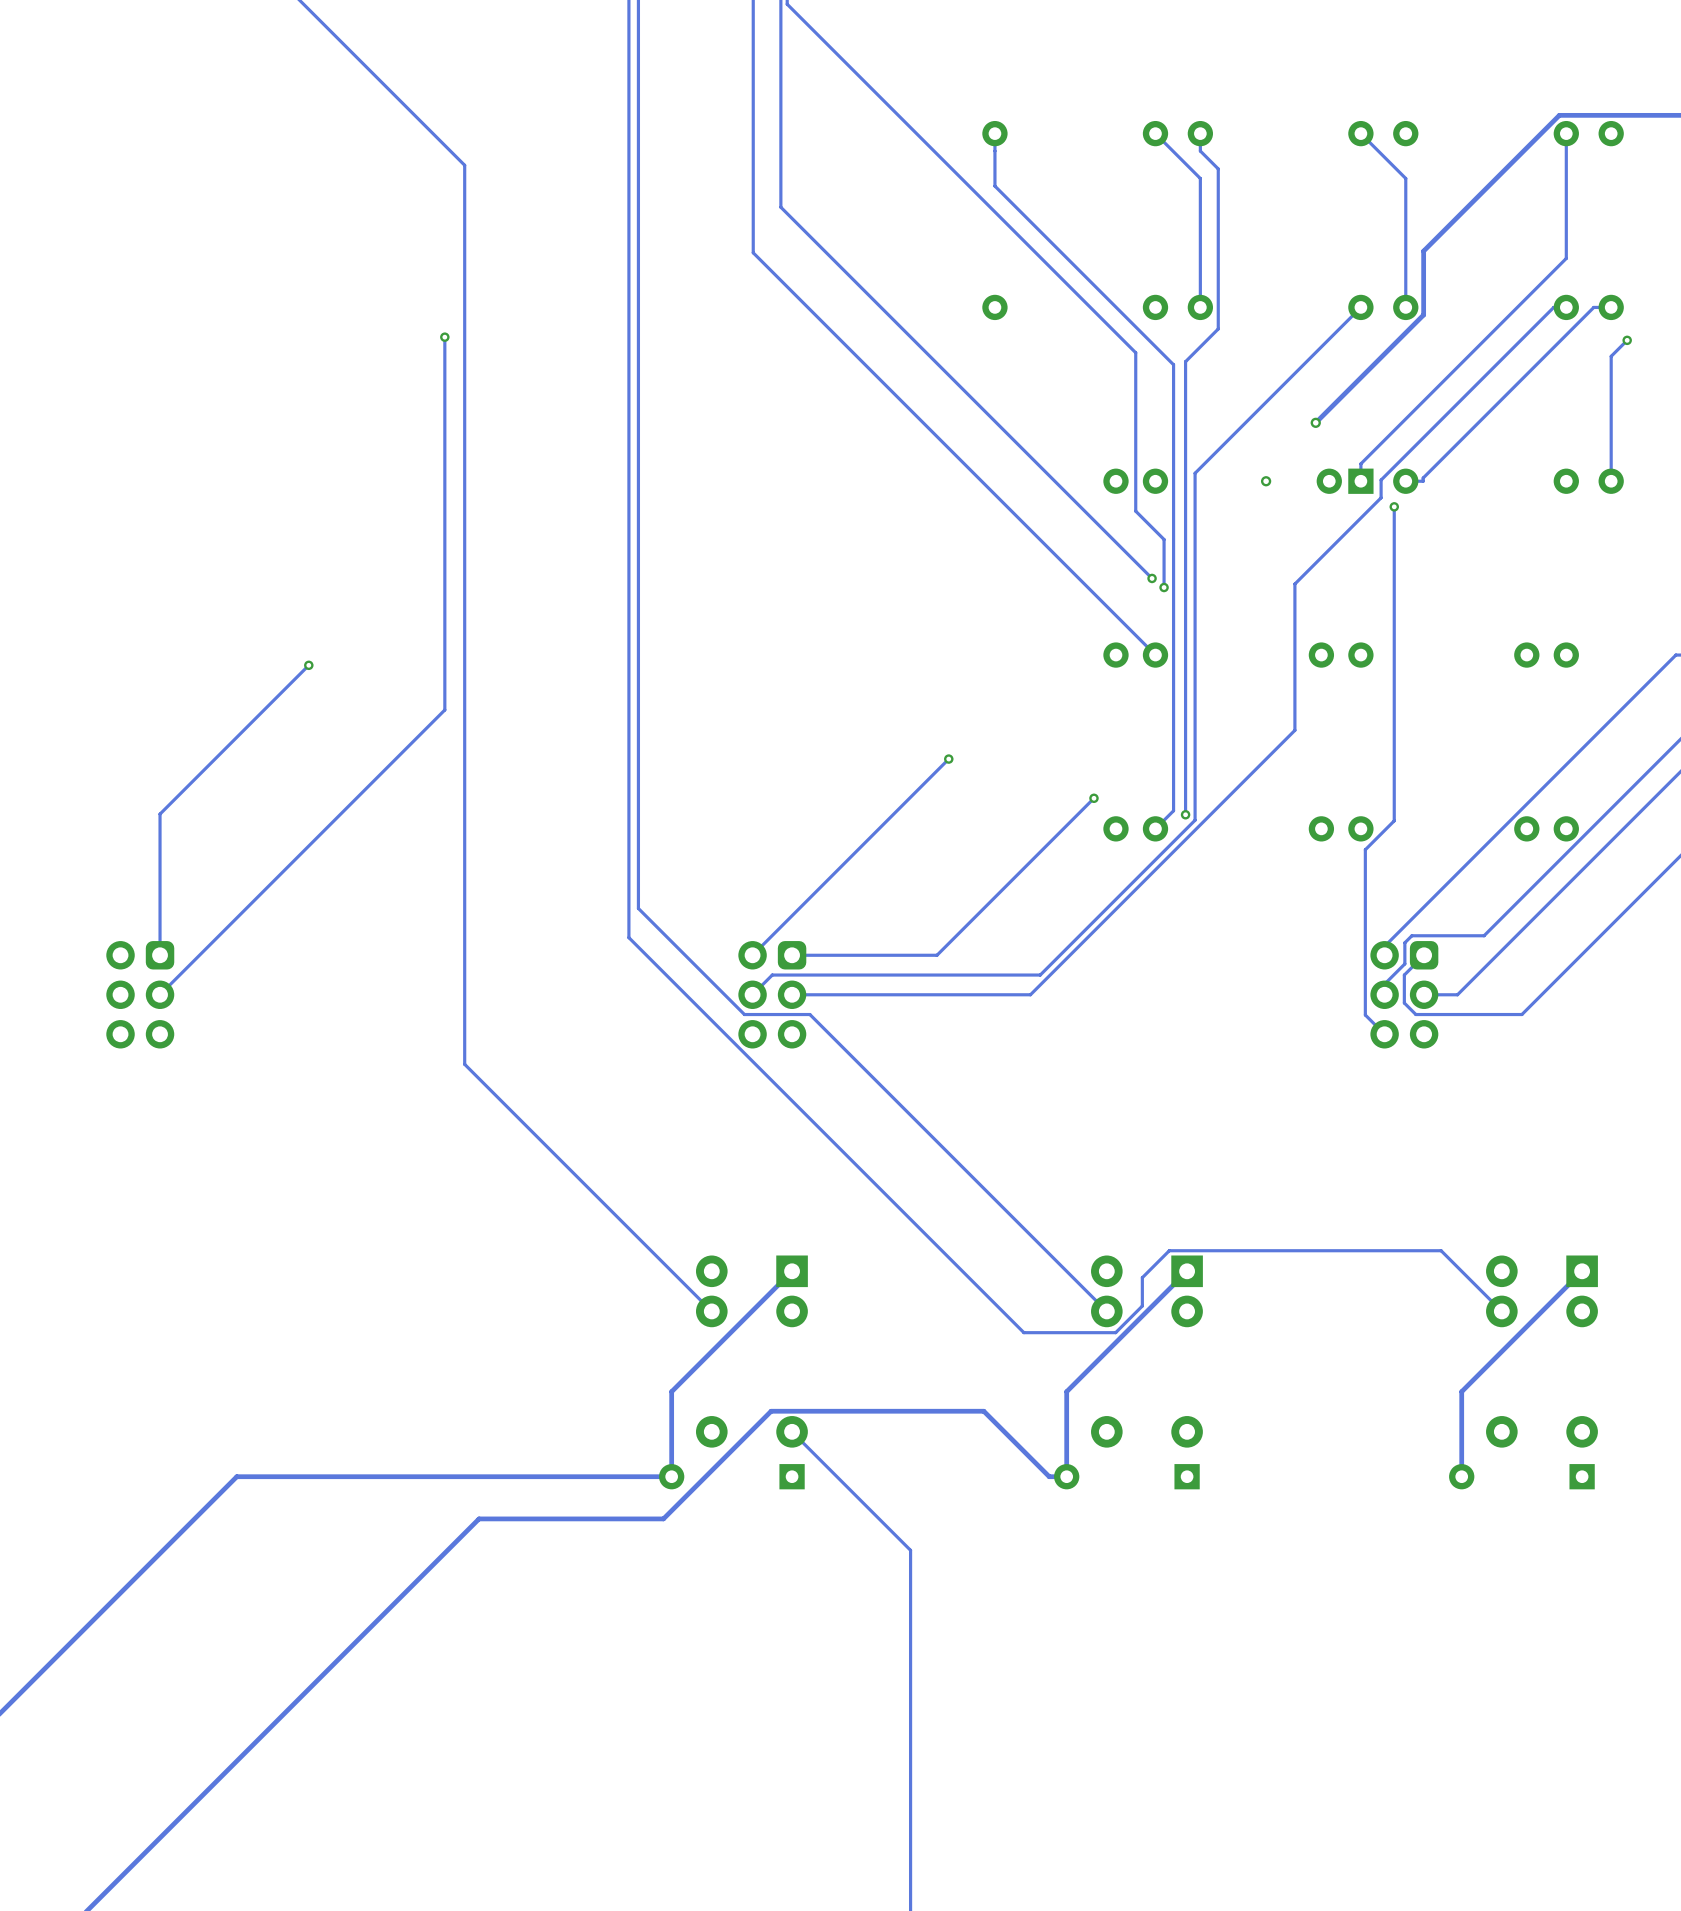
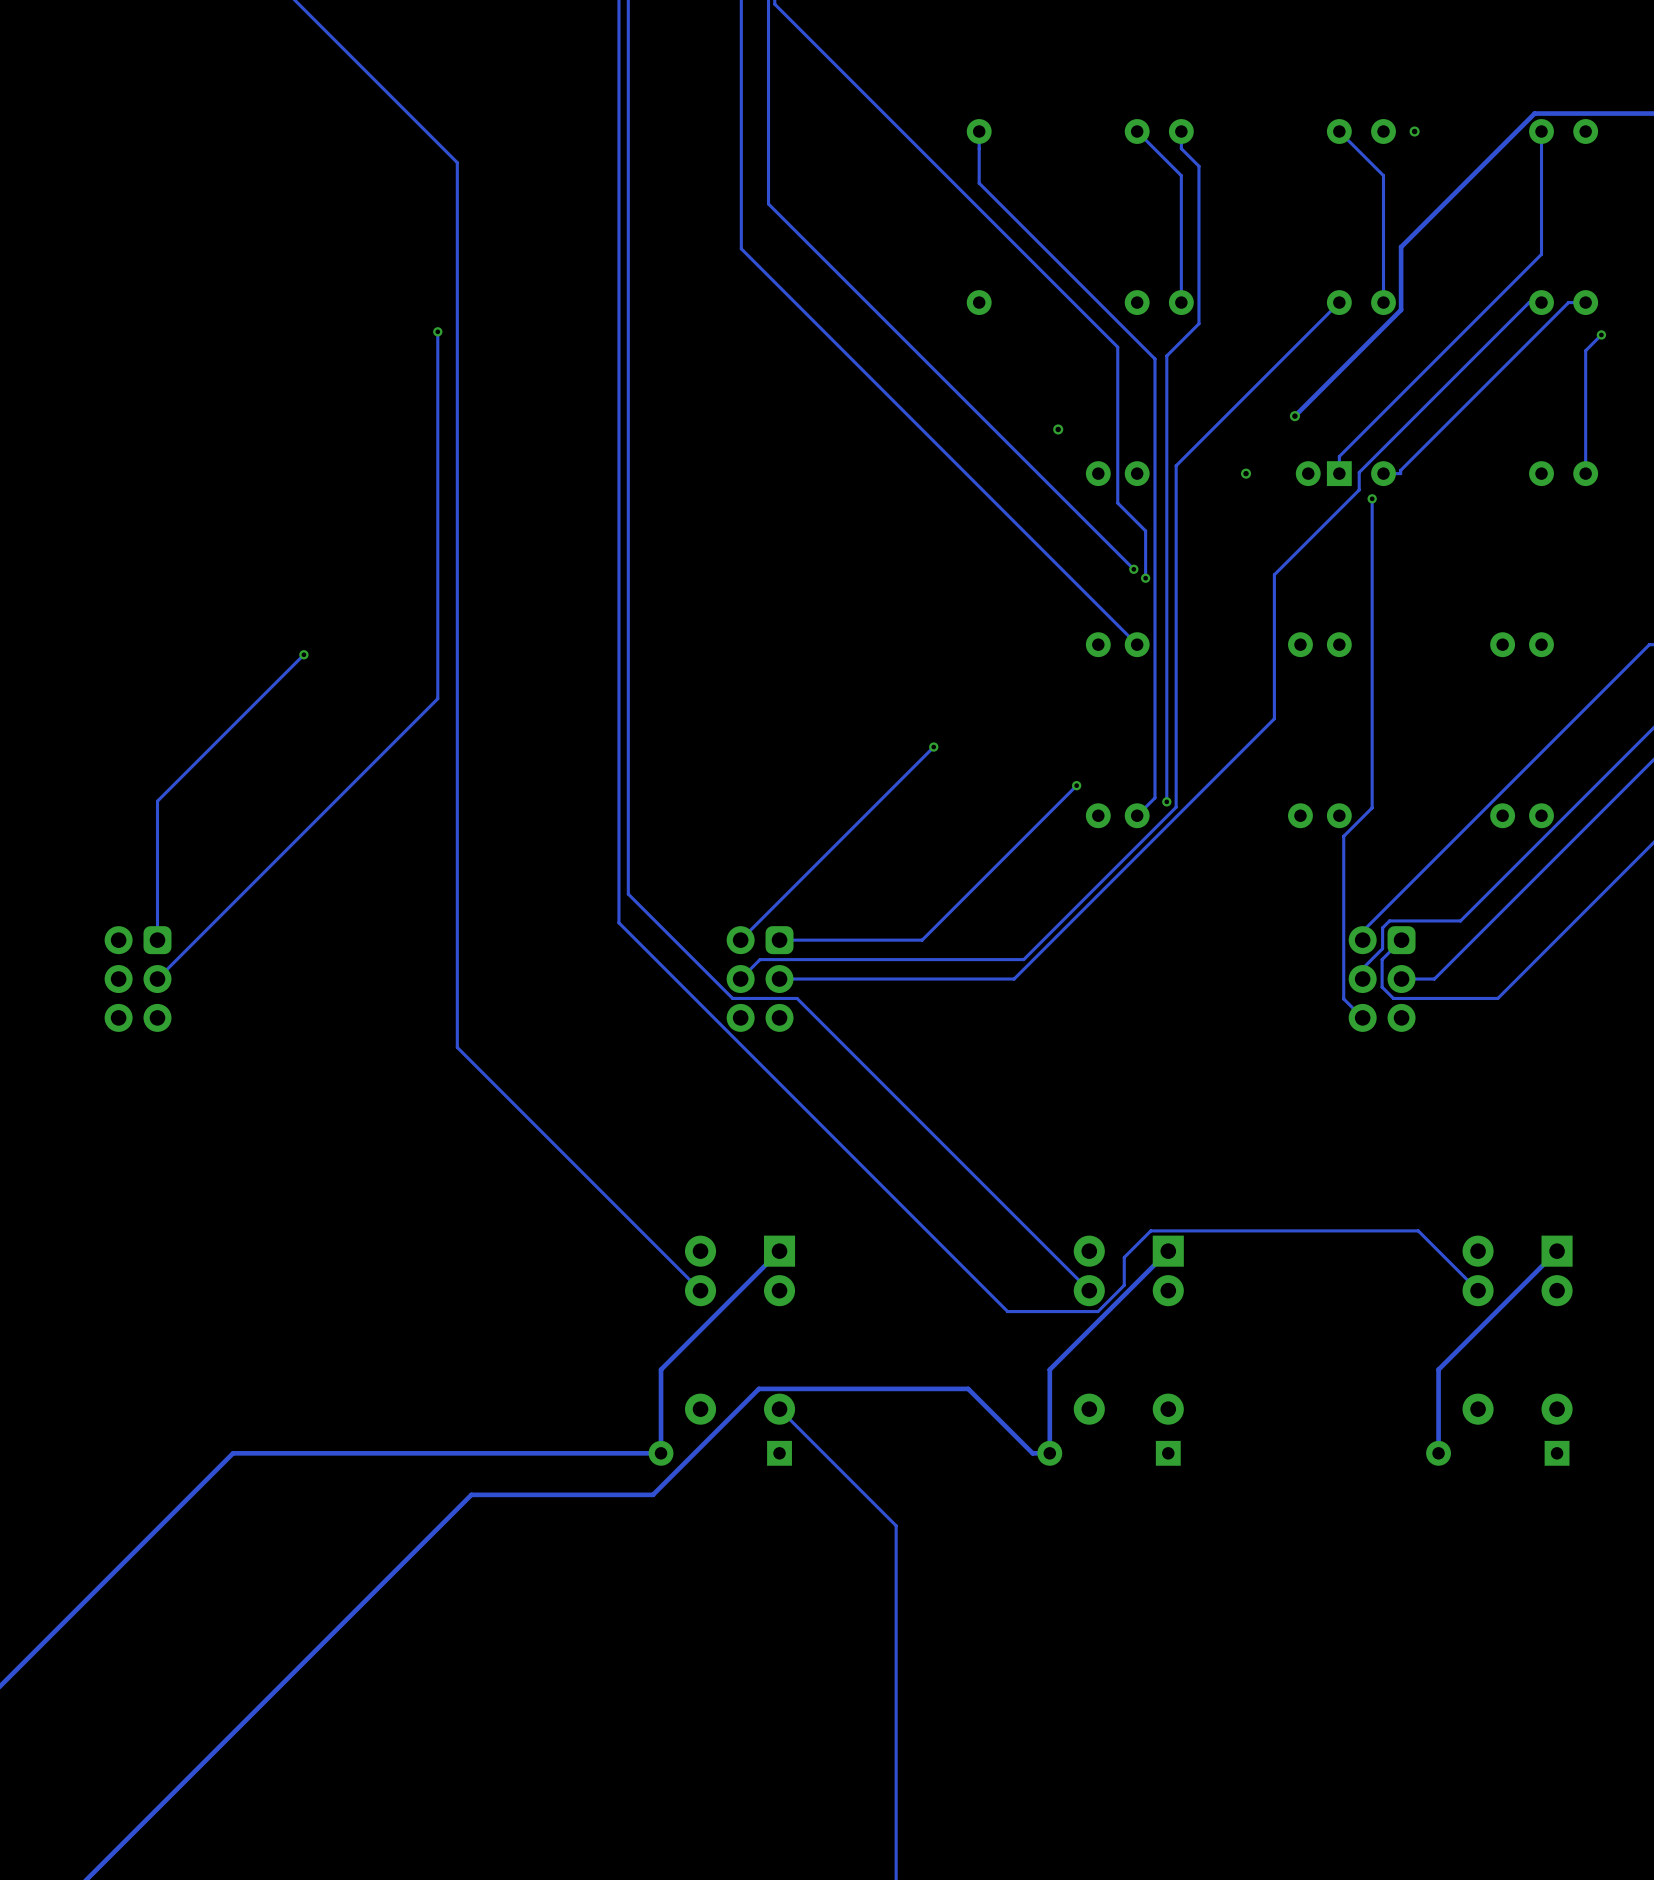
via: none -> (1414, 131)
via: none -> (1058, 429)

